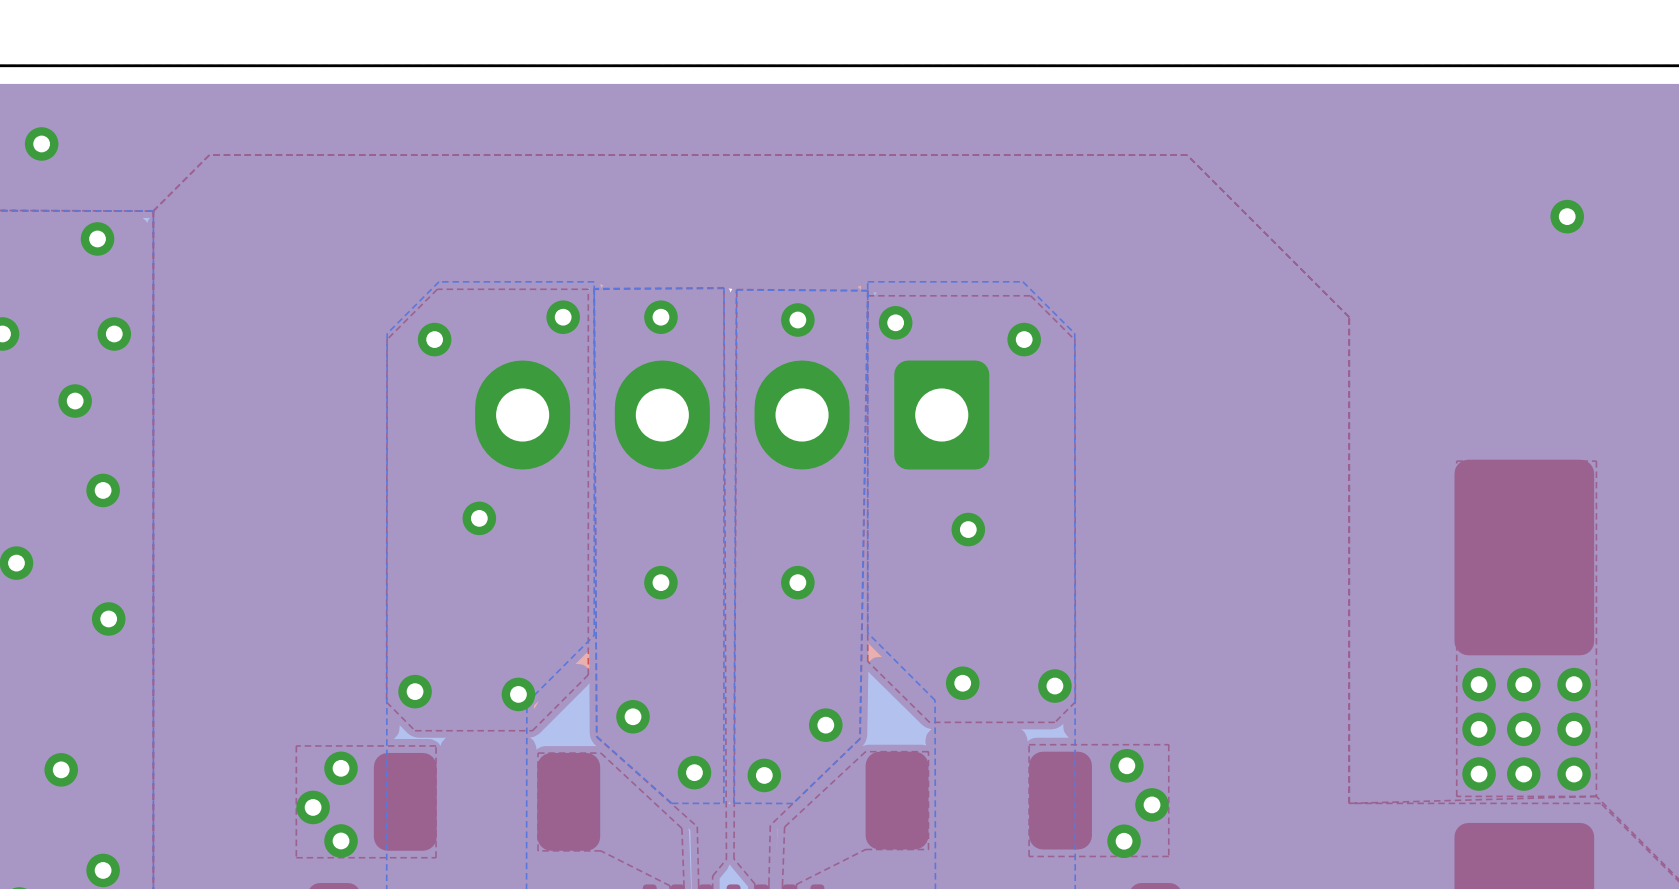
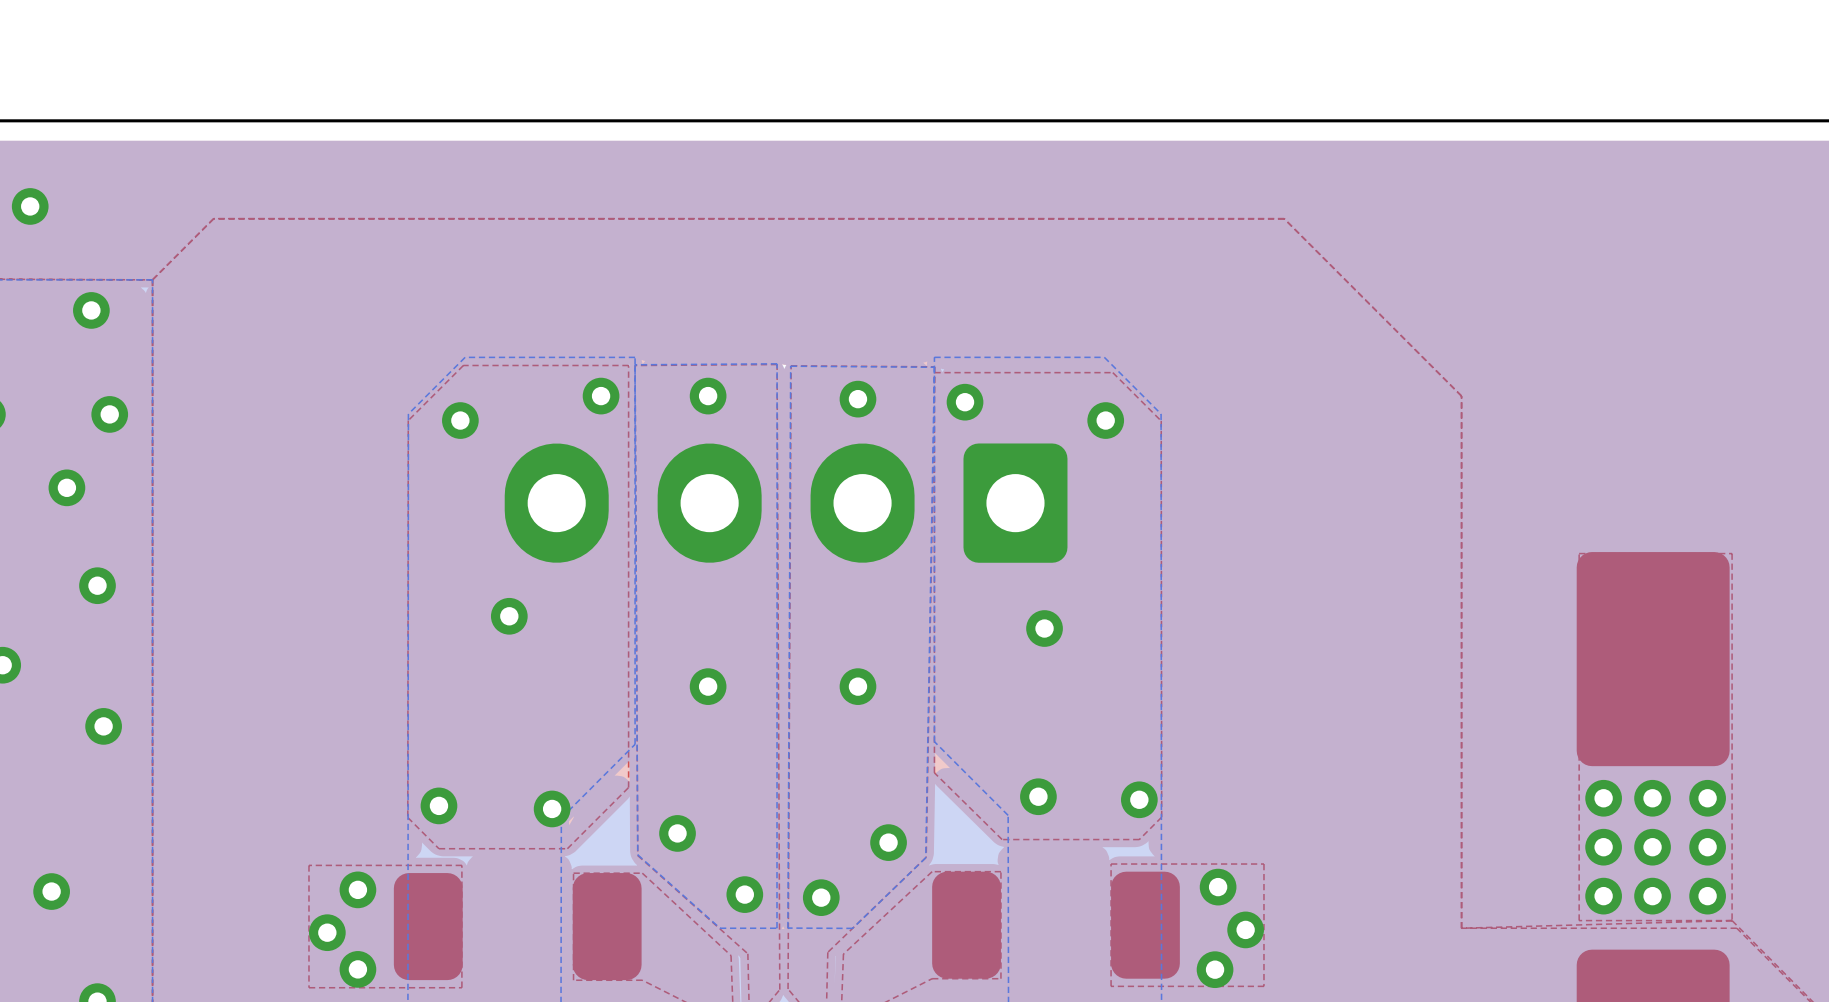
via: (1567, 216) -> none

